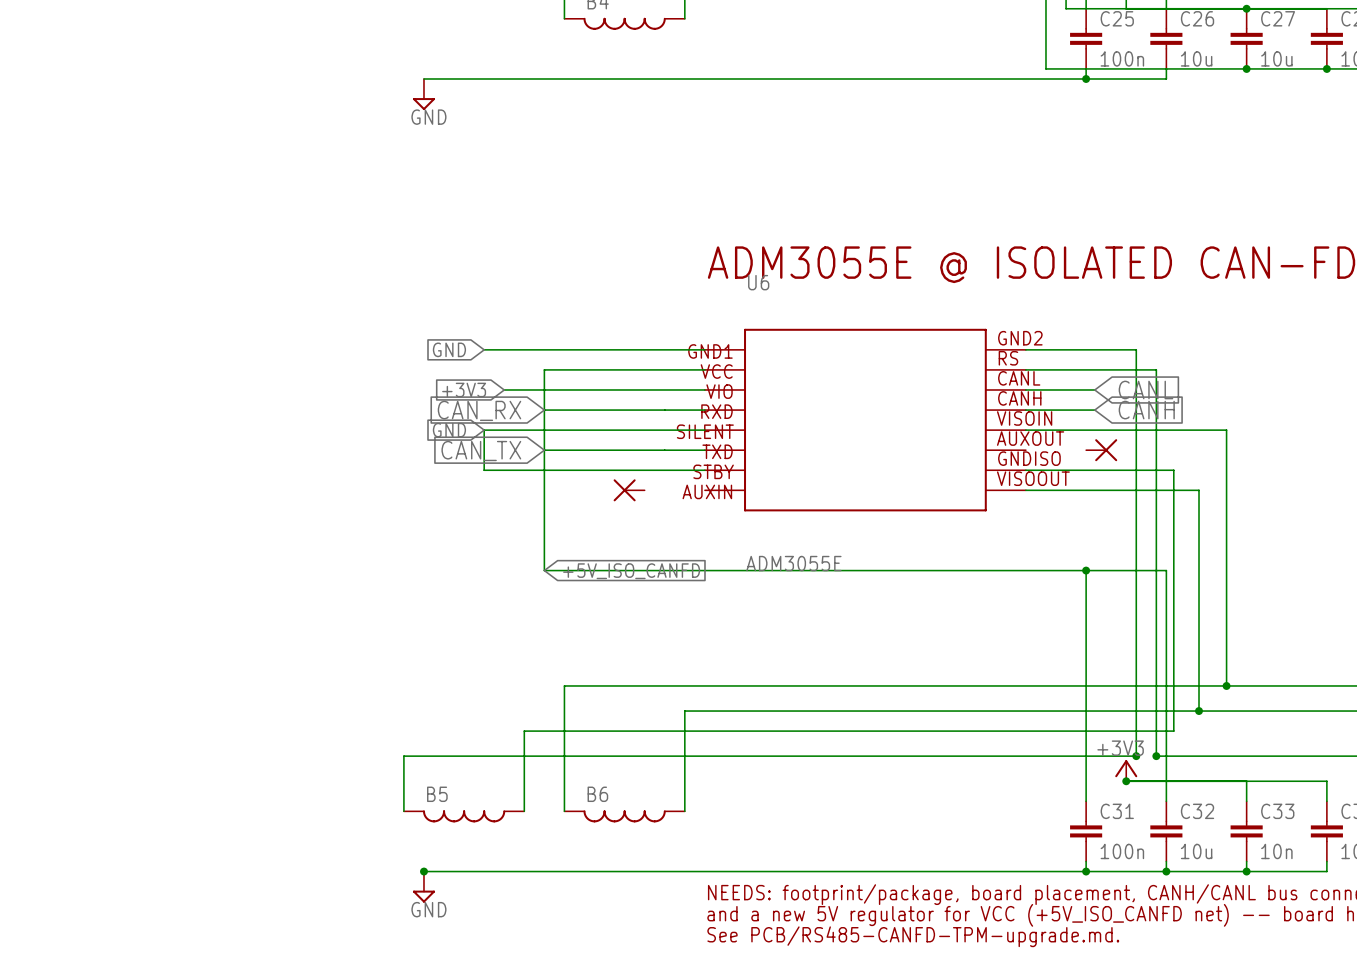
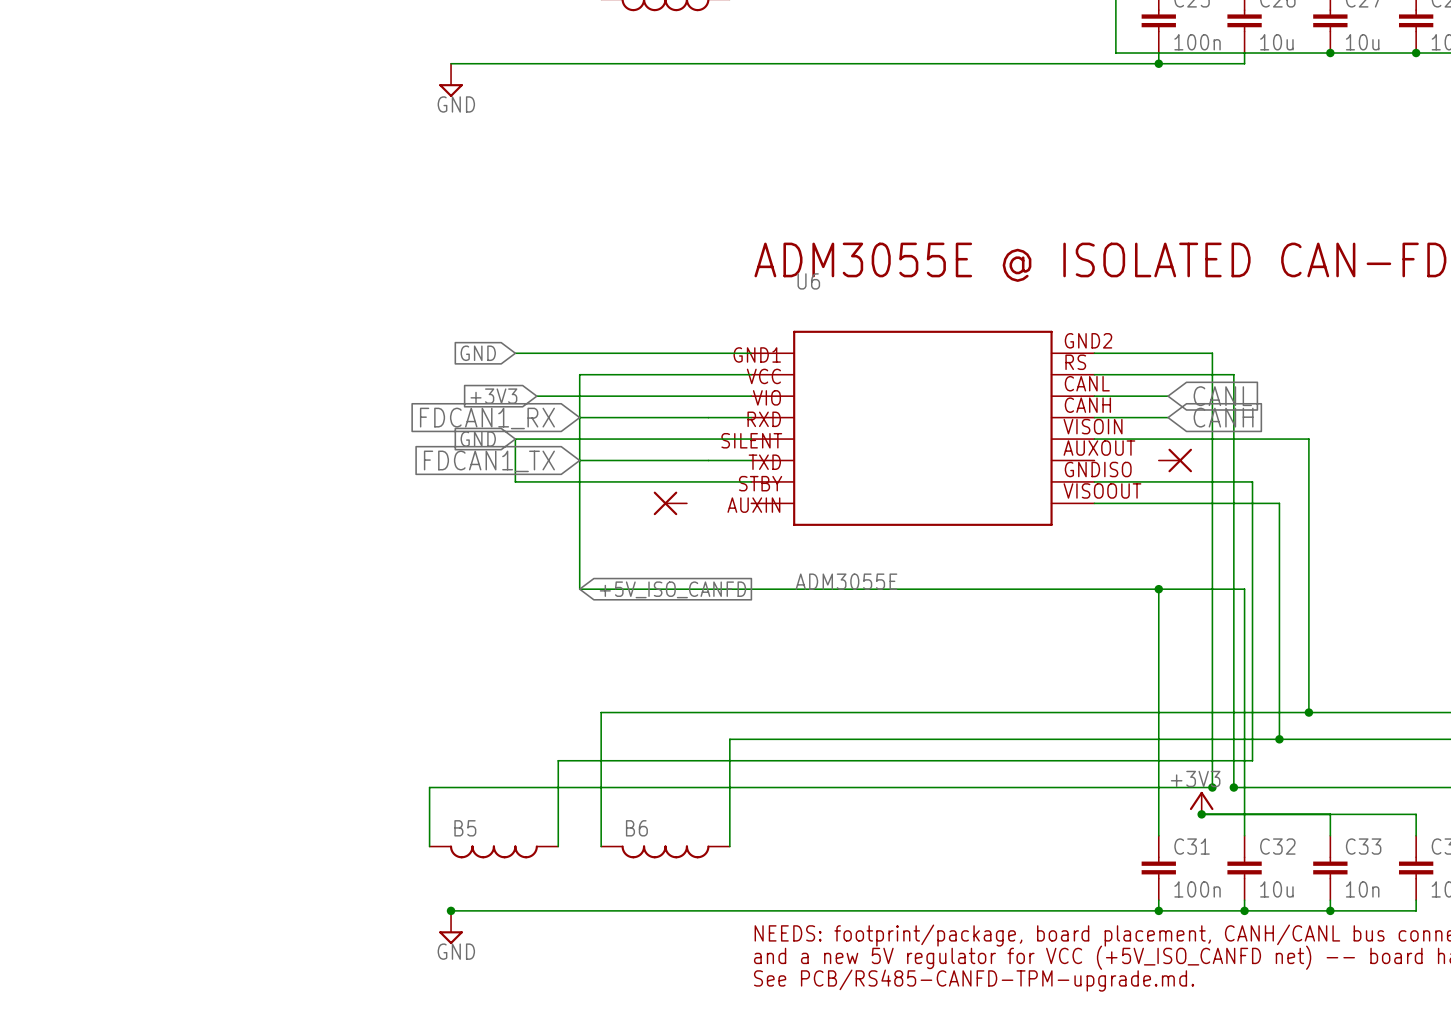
global label: CAN_RX (479, 410) -> FDCAN1_RX (487, 418)
global label: CAN_TX (481, 451) -> FDCAN1_TX (489, 461)

